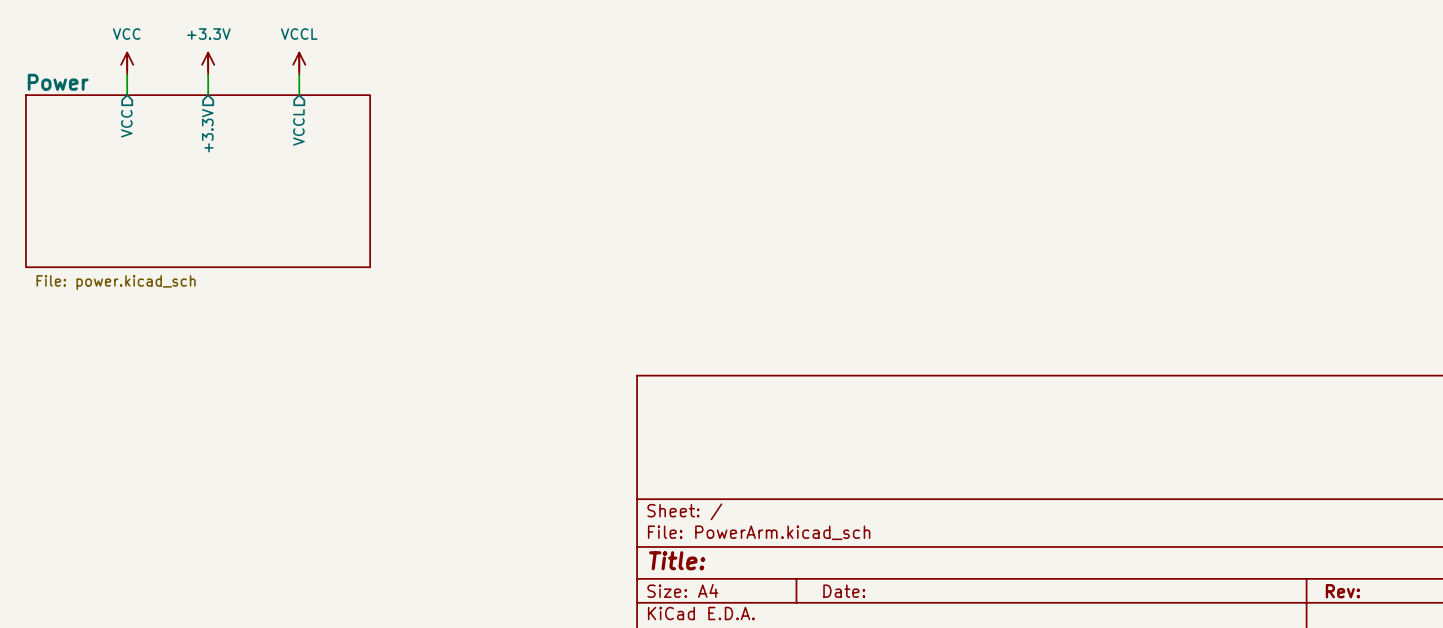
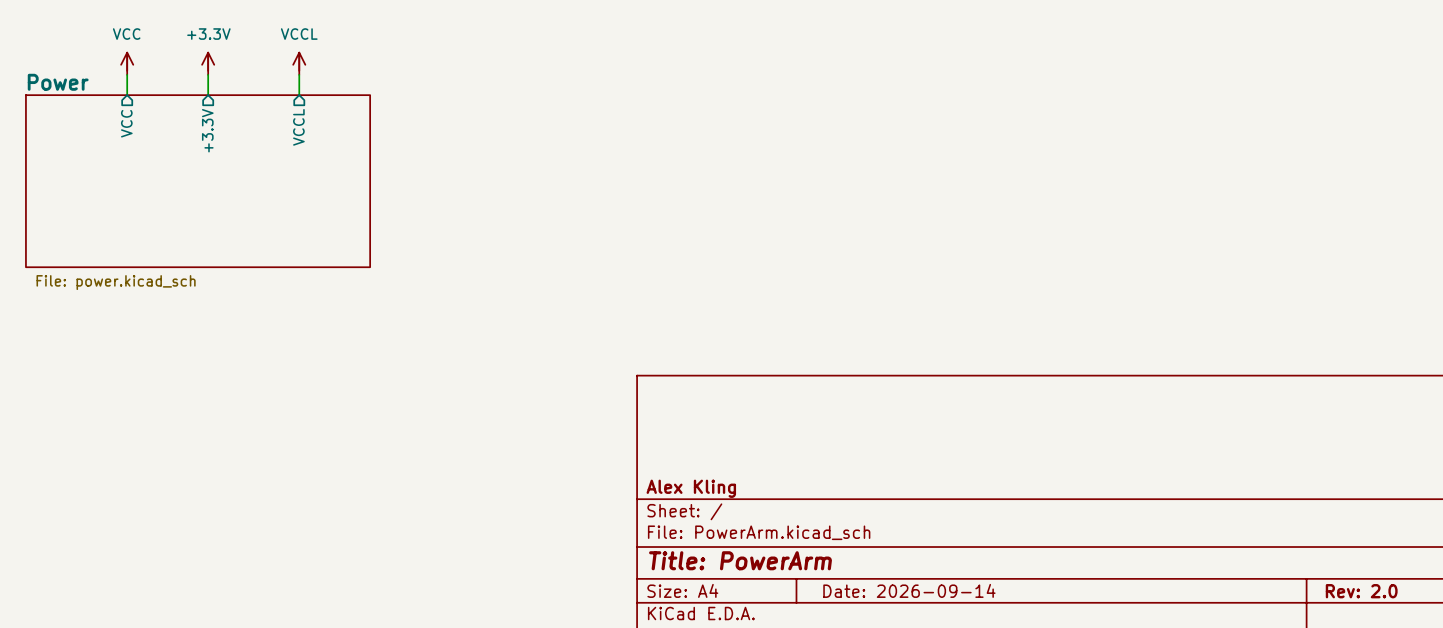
title block: none -> Alex Kling (691, 488)
title block: Title: (677, 560) -> Title: PowerArm (740, 560)
title block: Date: (844, 591) -> Date: 2026-09-14 (909, 590)
title block: Rev: (1342, 591) -> Rev: 2.0 (1361, 591)

